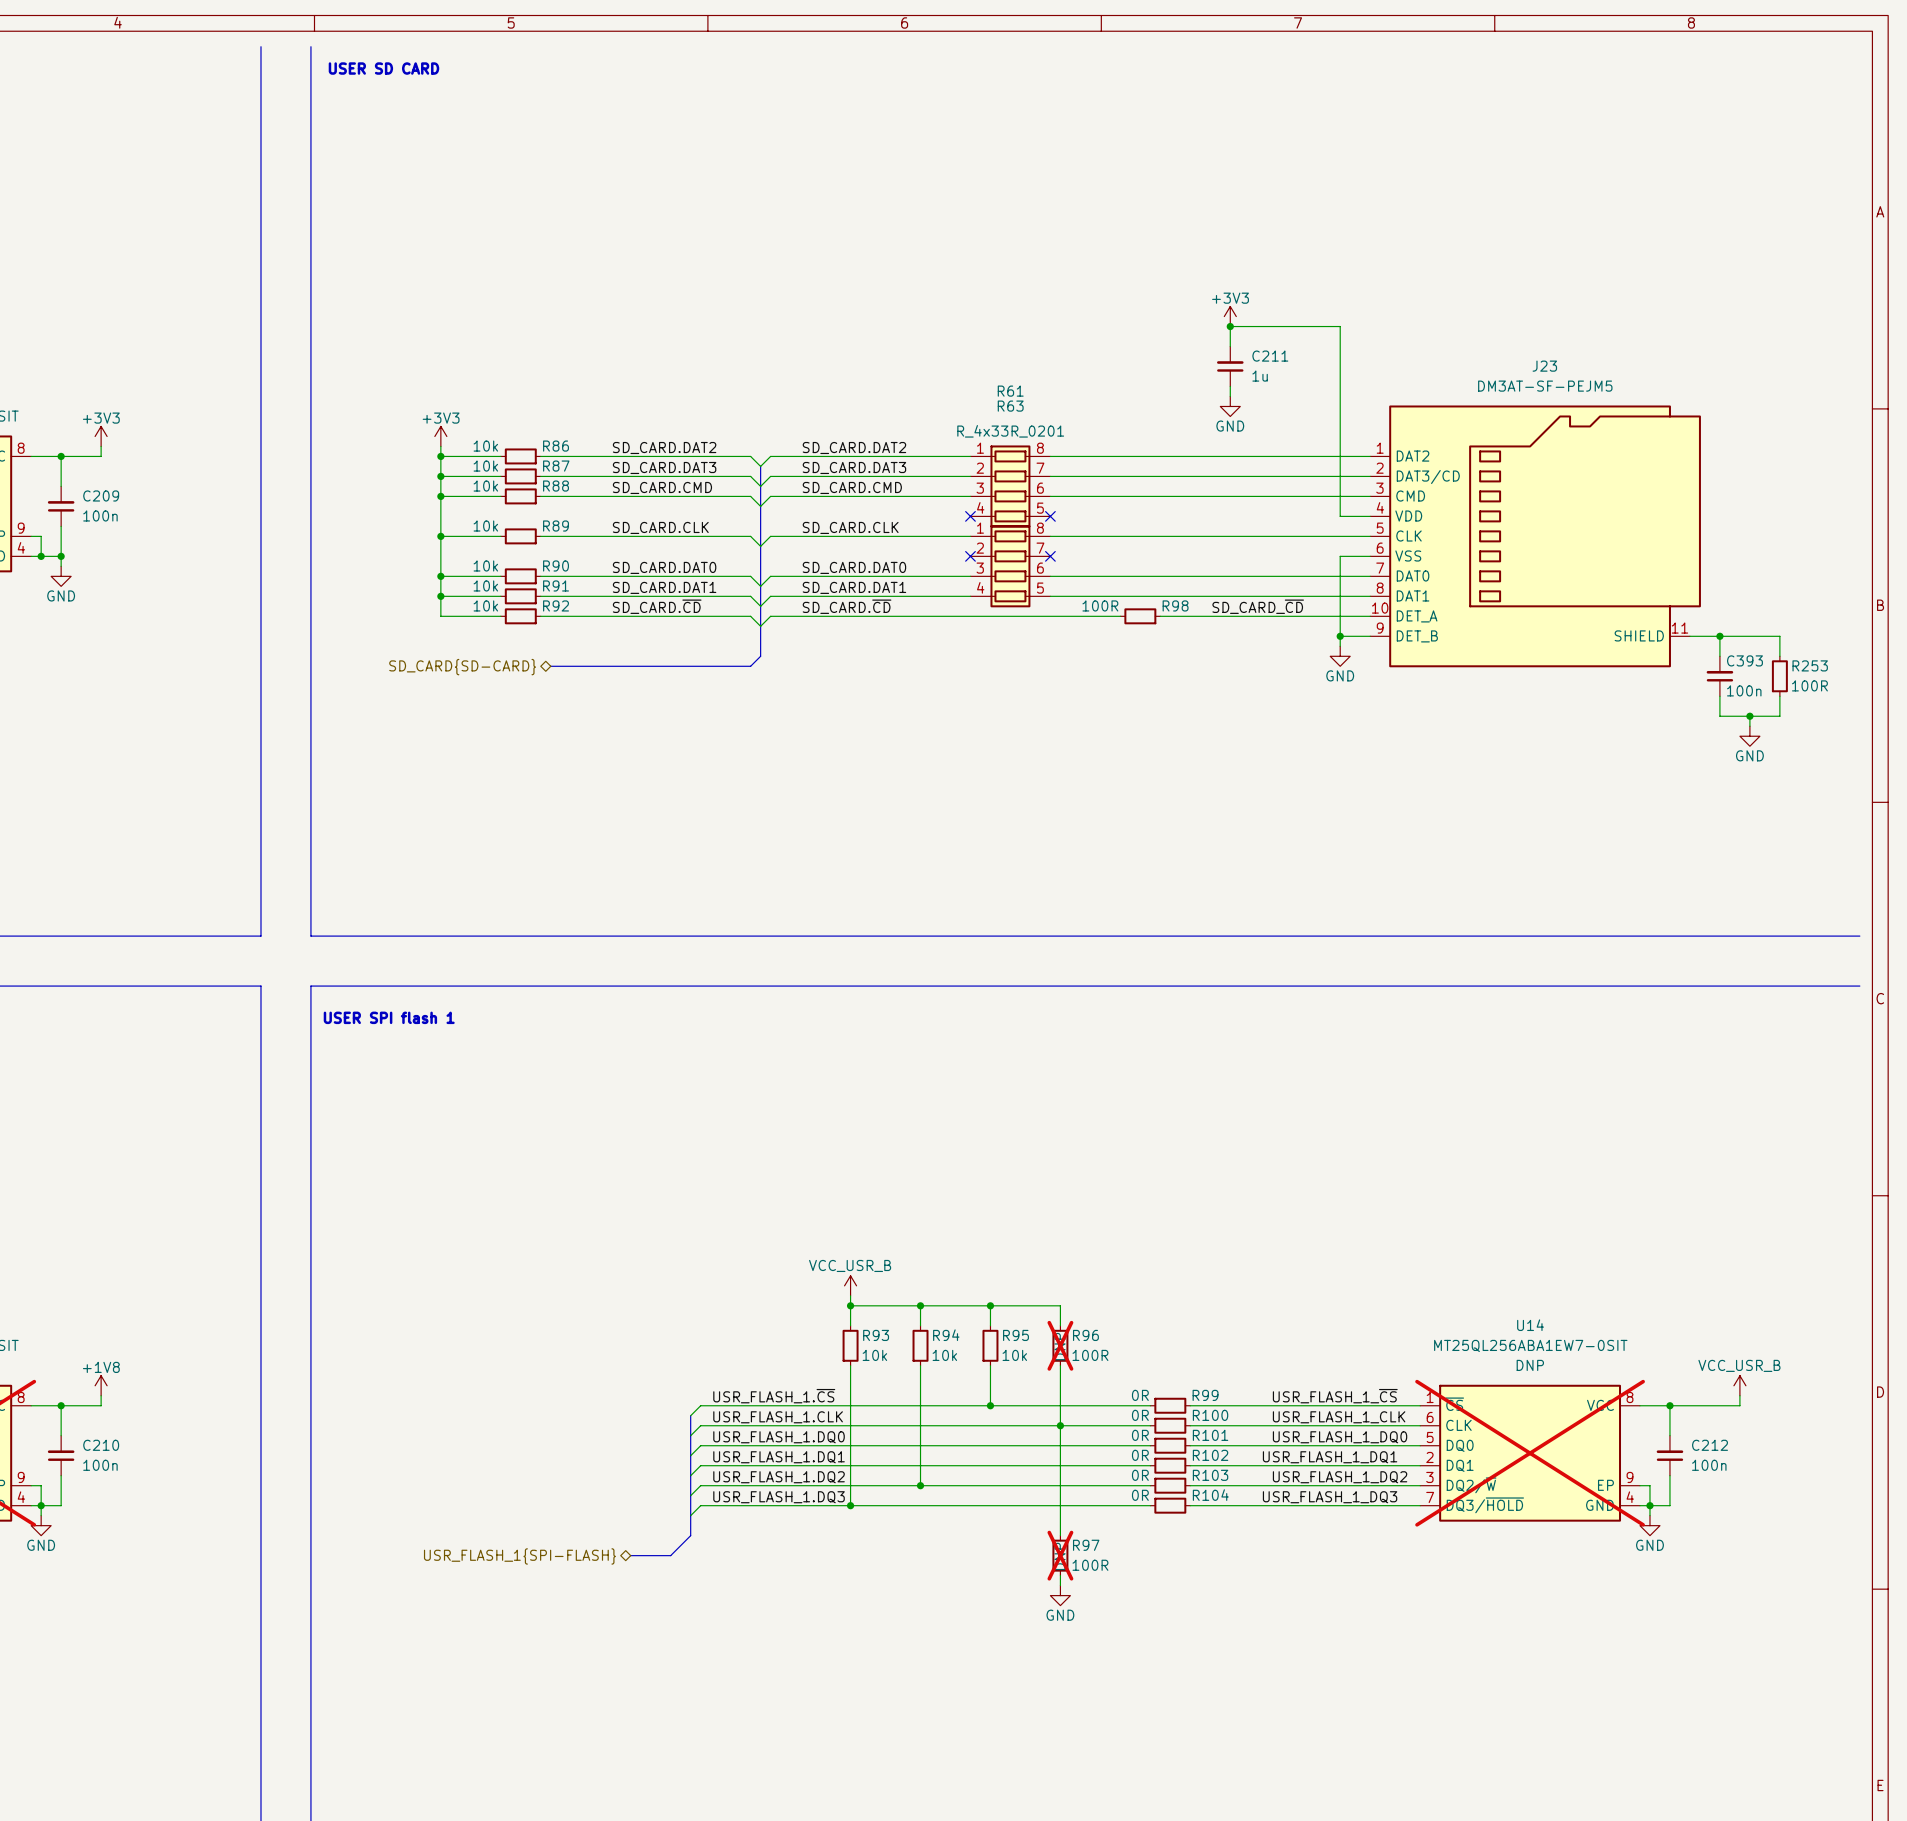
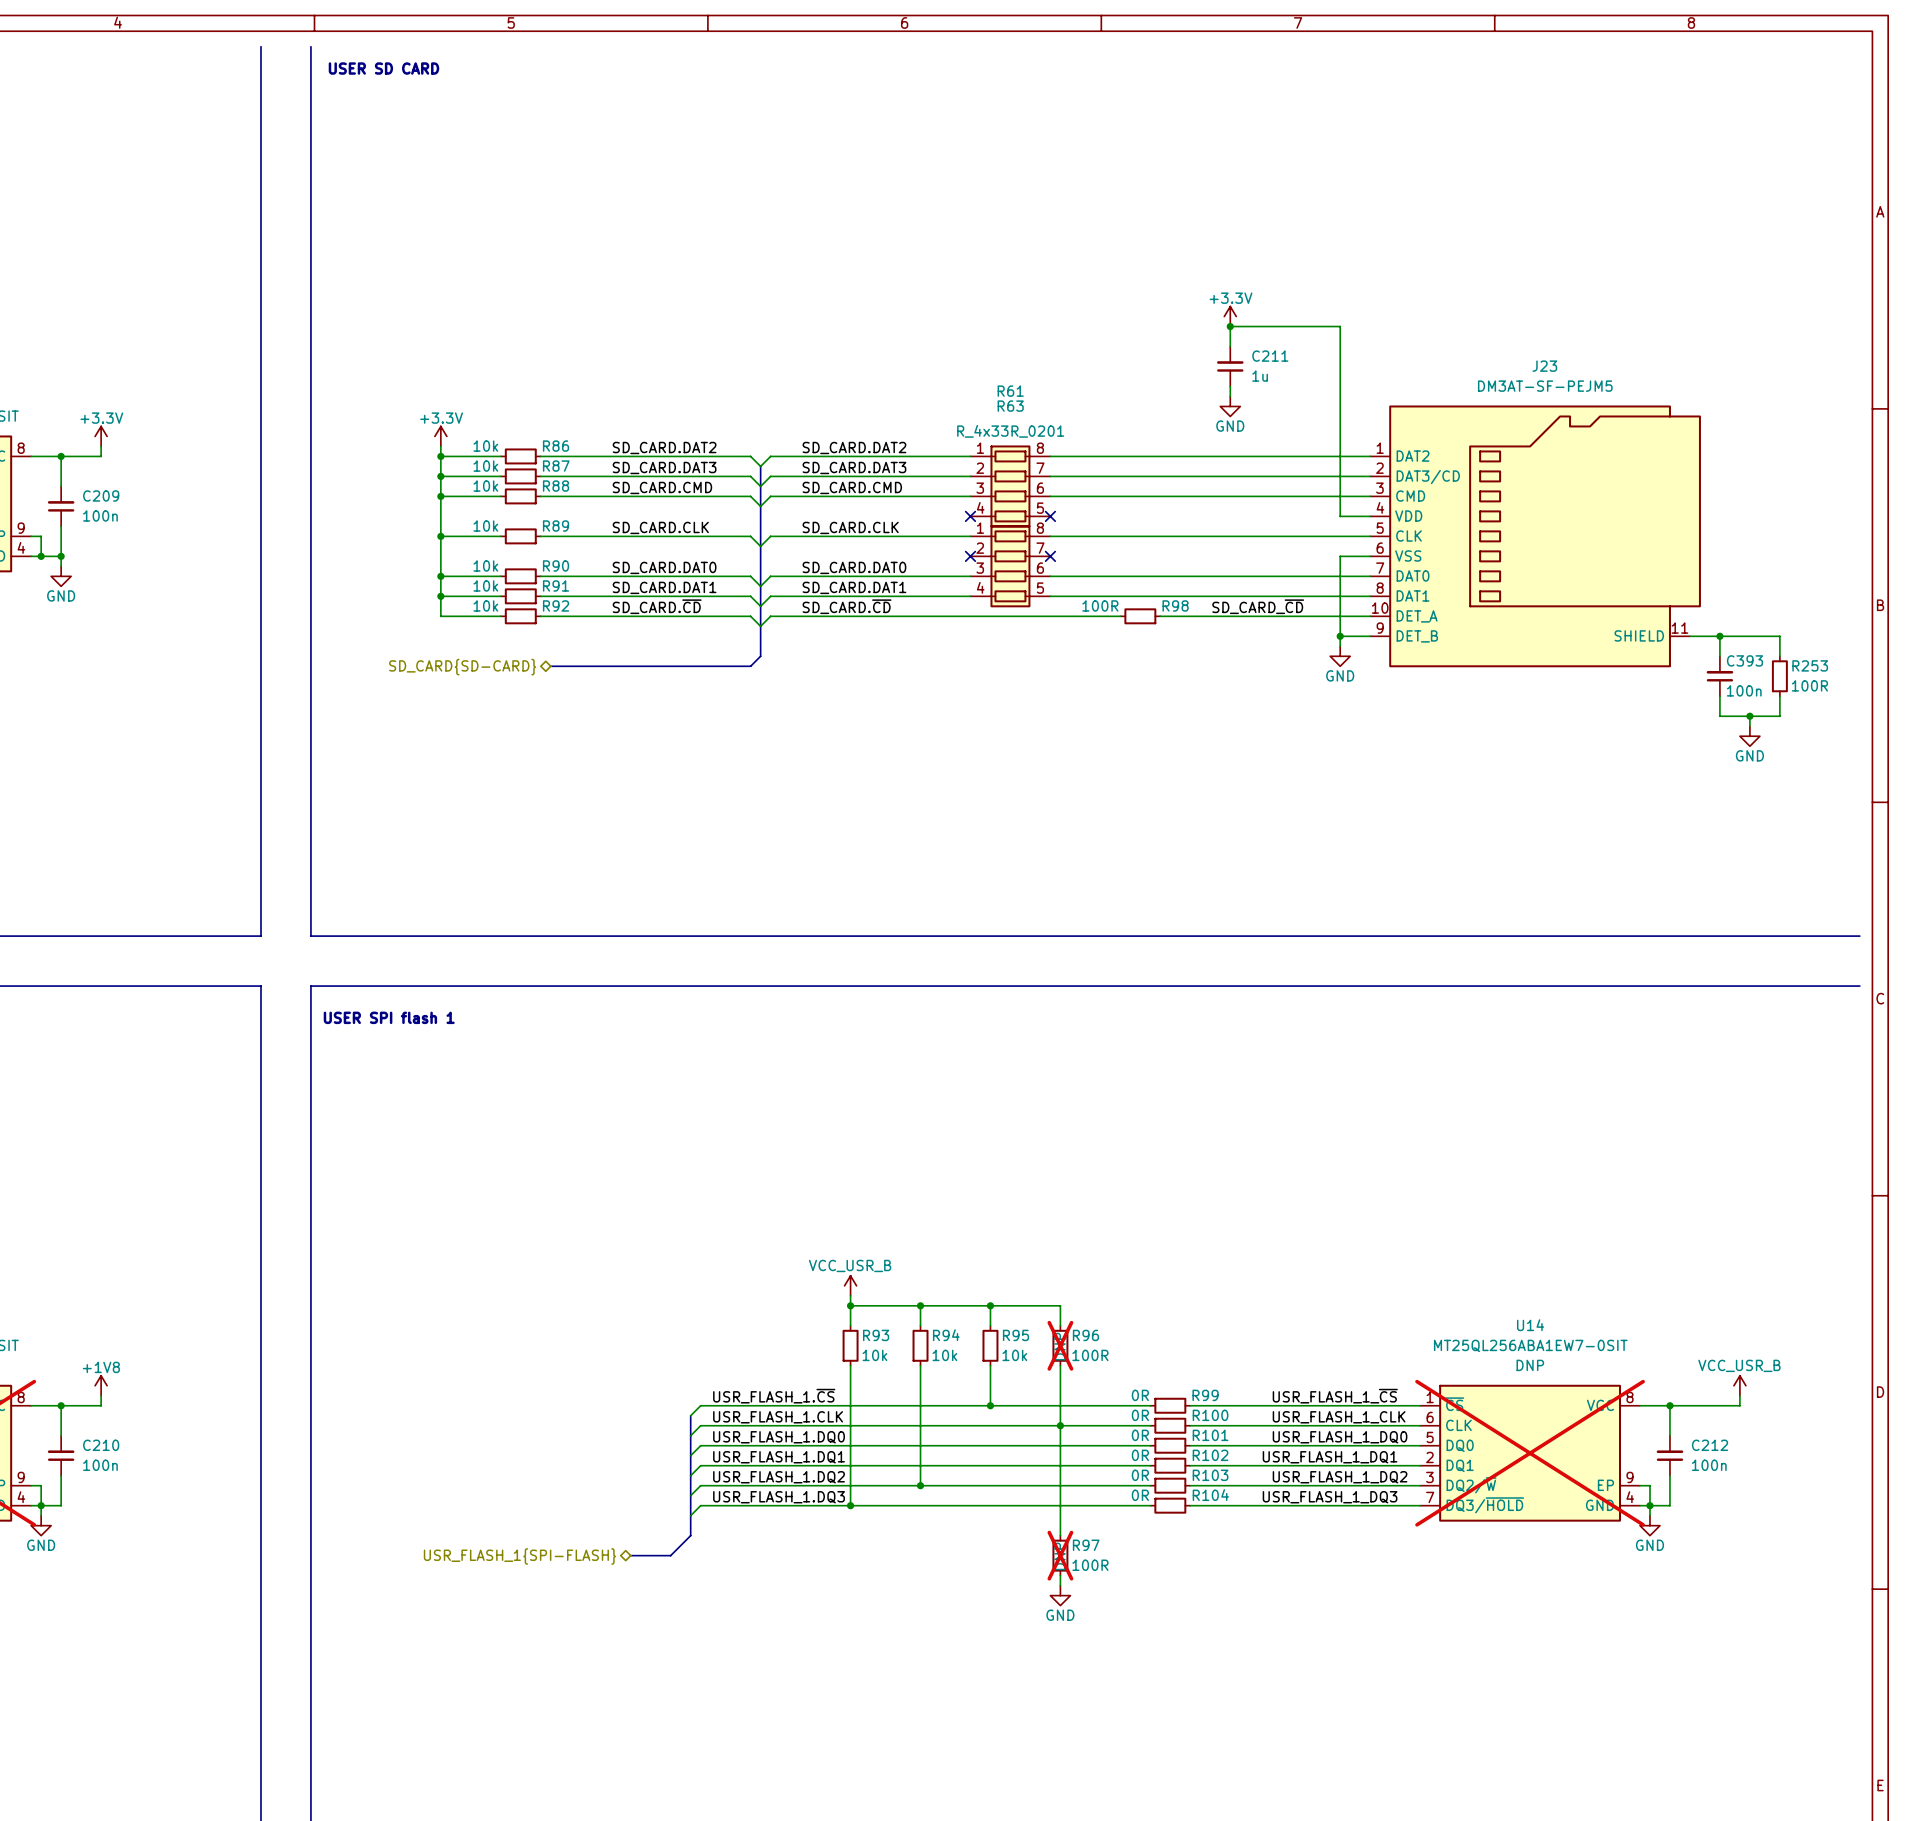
power symbol: +3V3 (1230, 316) -> +3.3V (1230, 316)
power symbol: +3V3 (101, 436) -> +3.3V (101, 436)
power symbol: +3V3 (440, 436) -> +3.3V (440, 436)

